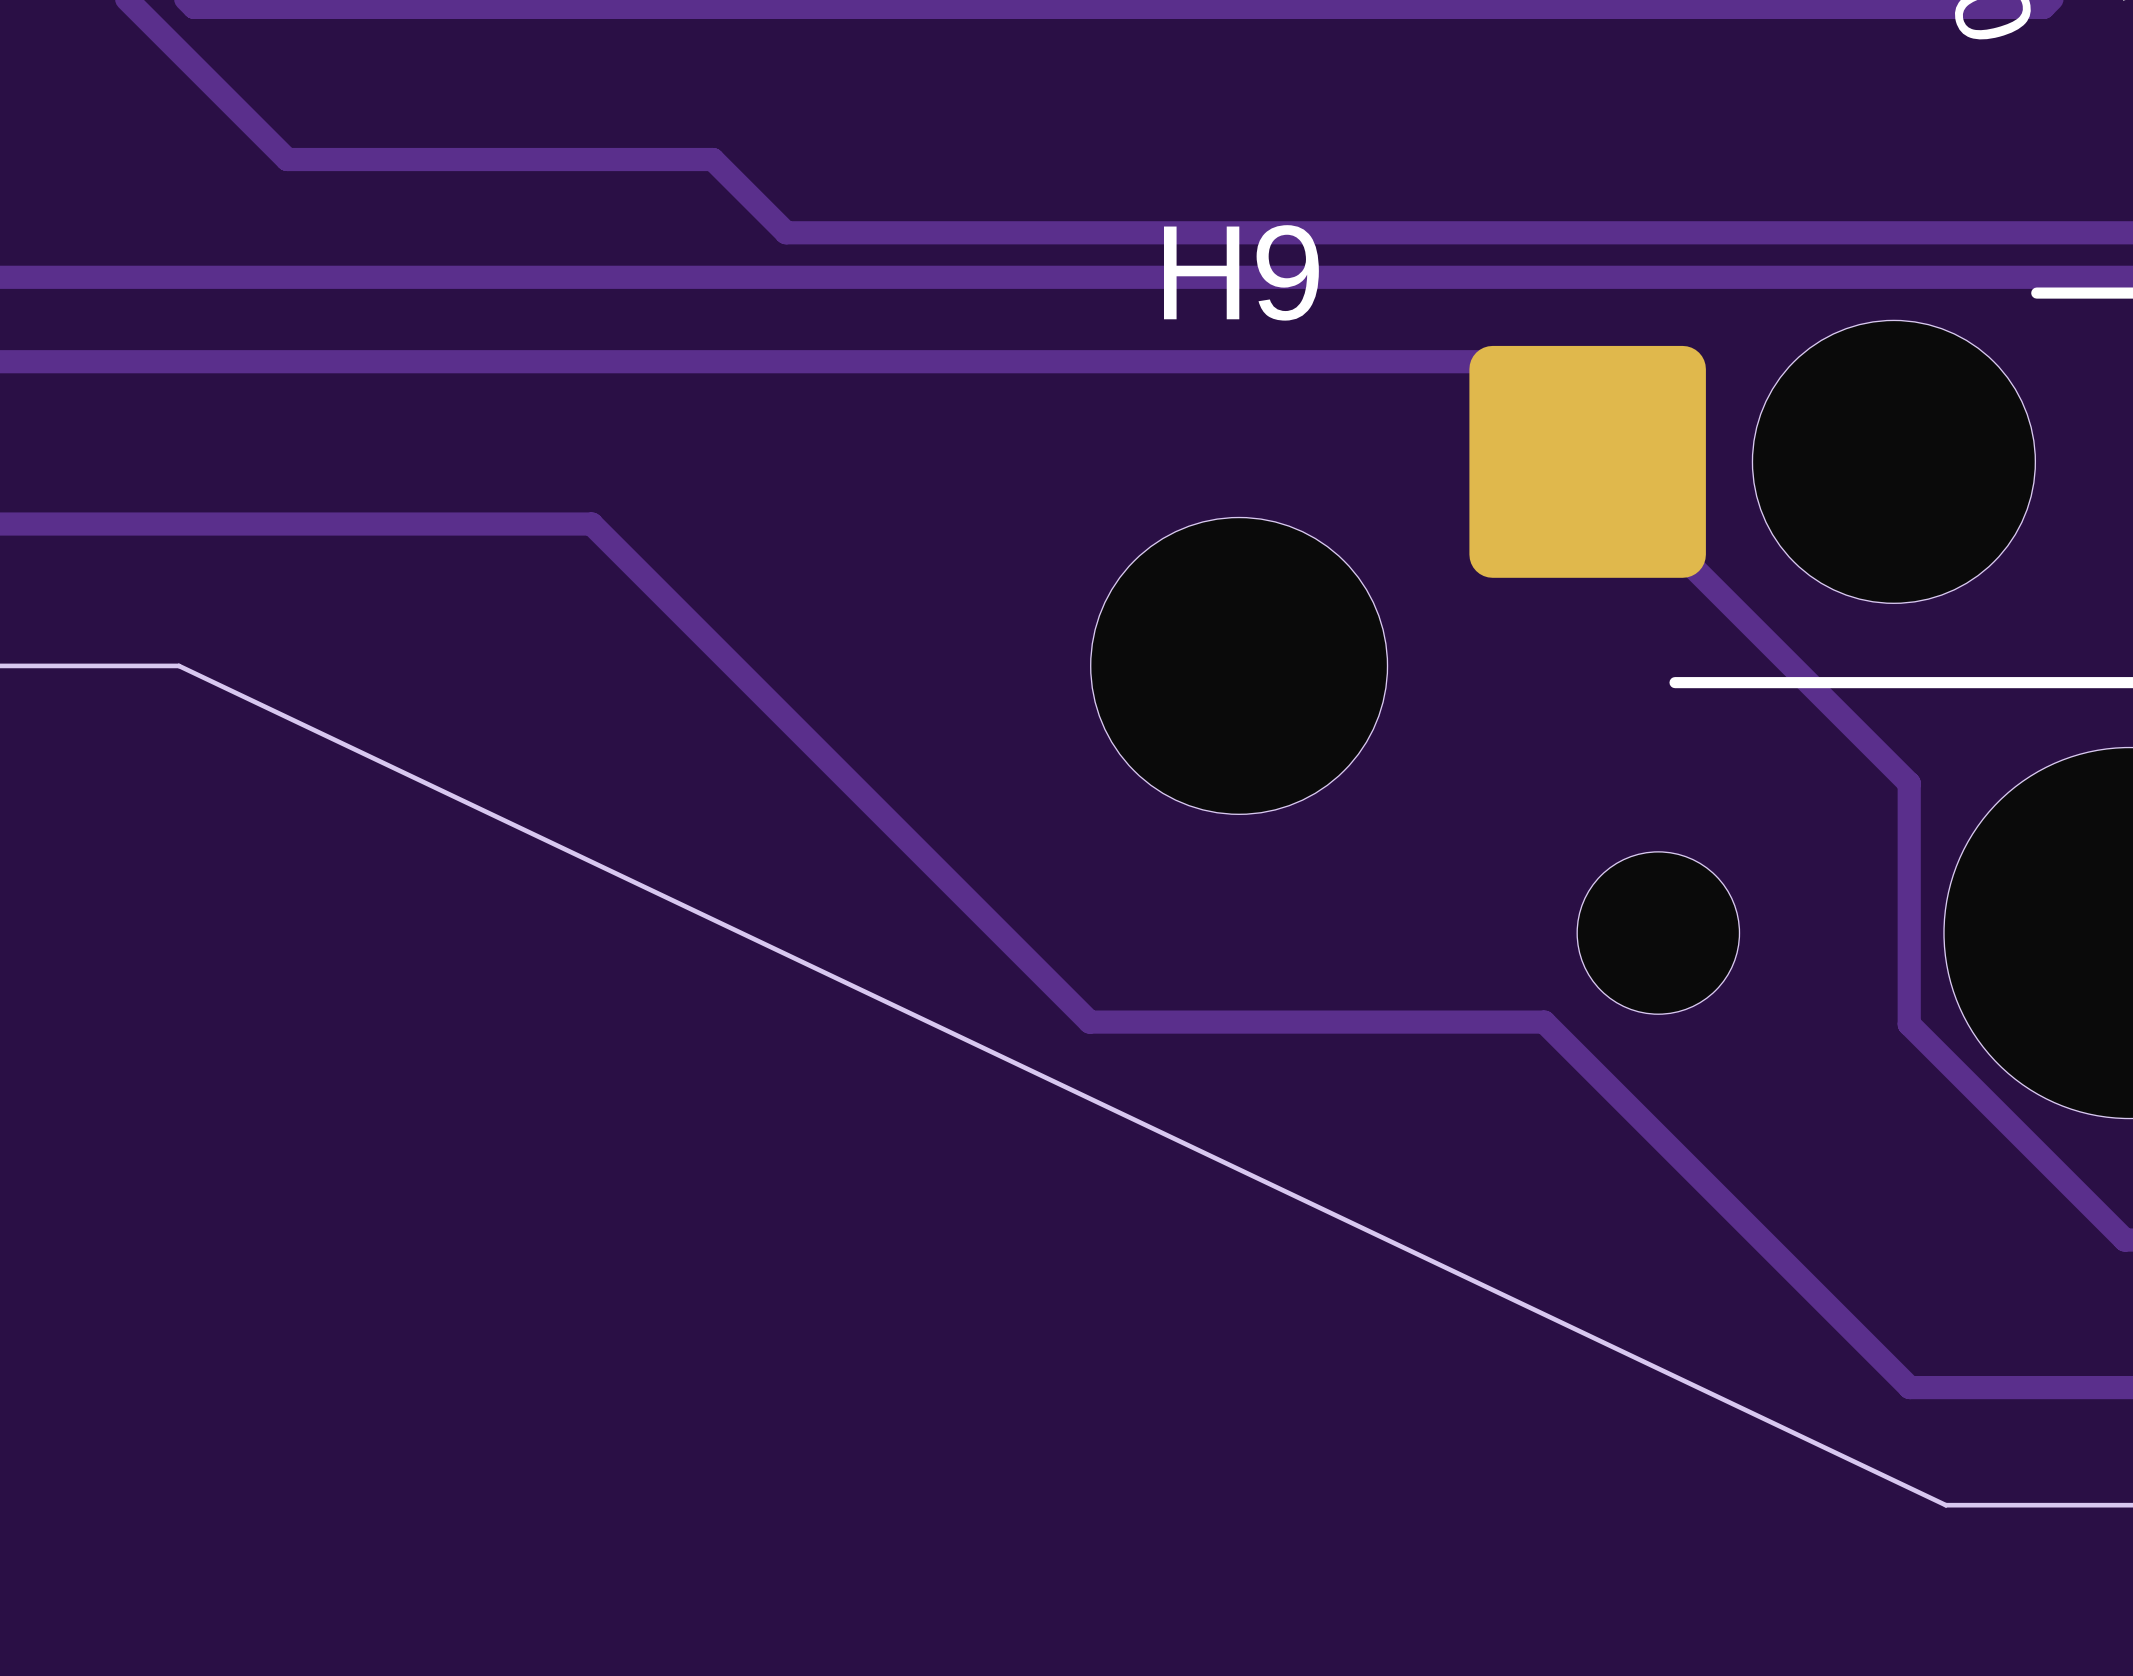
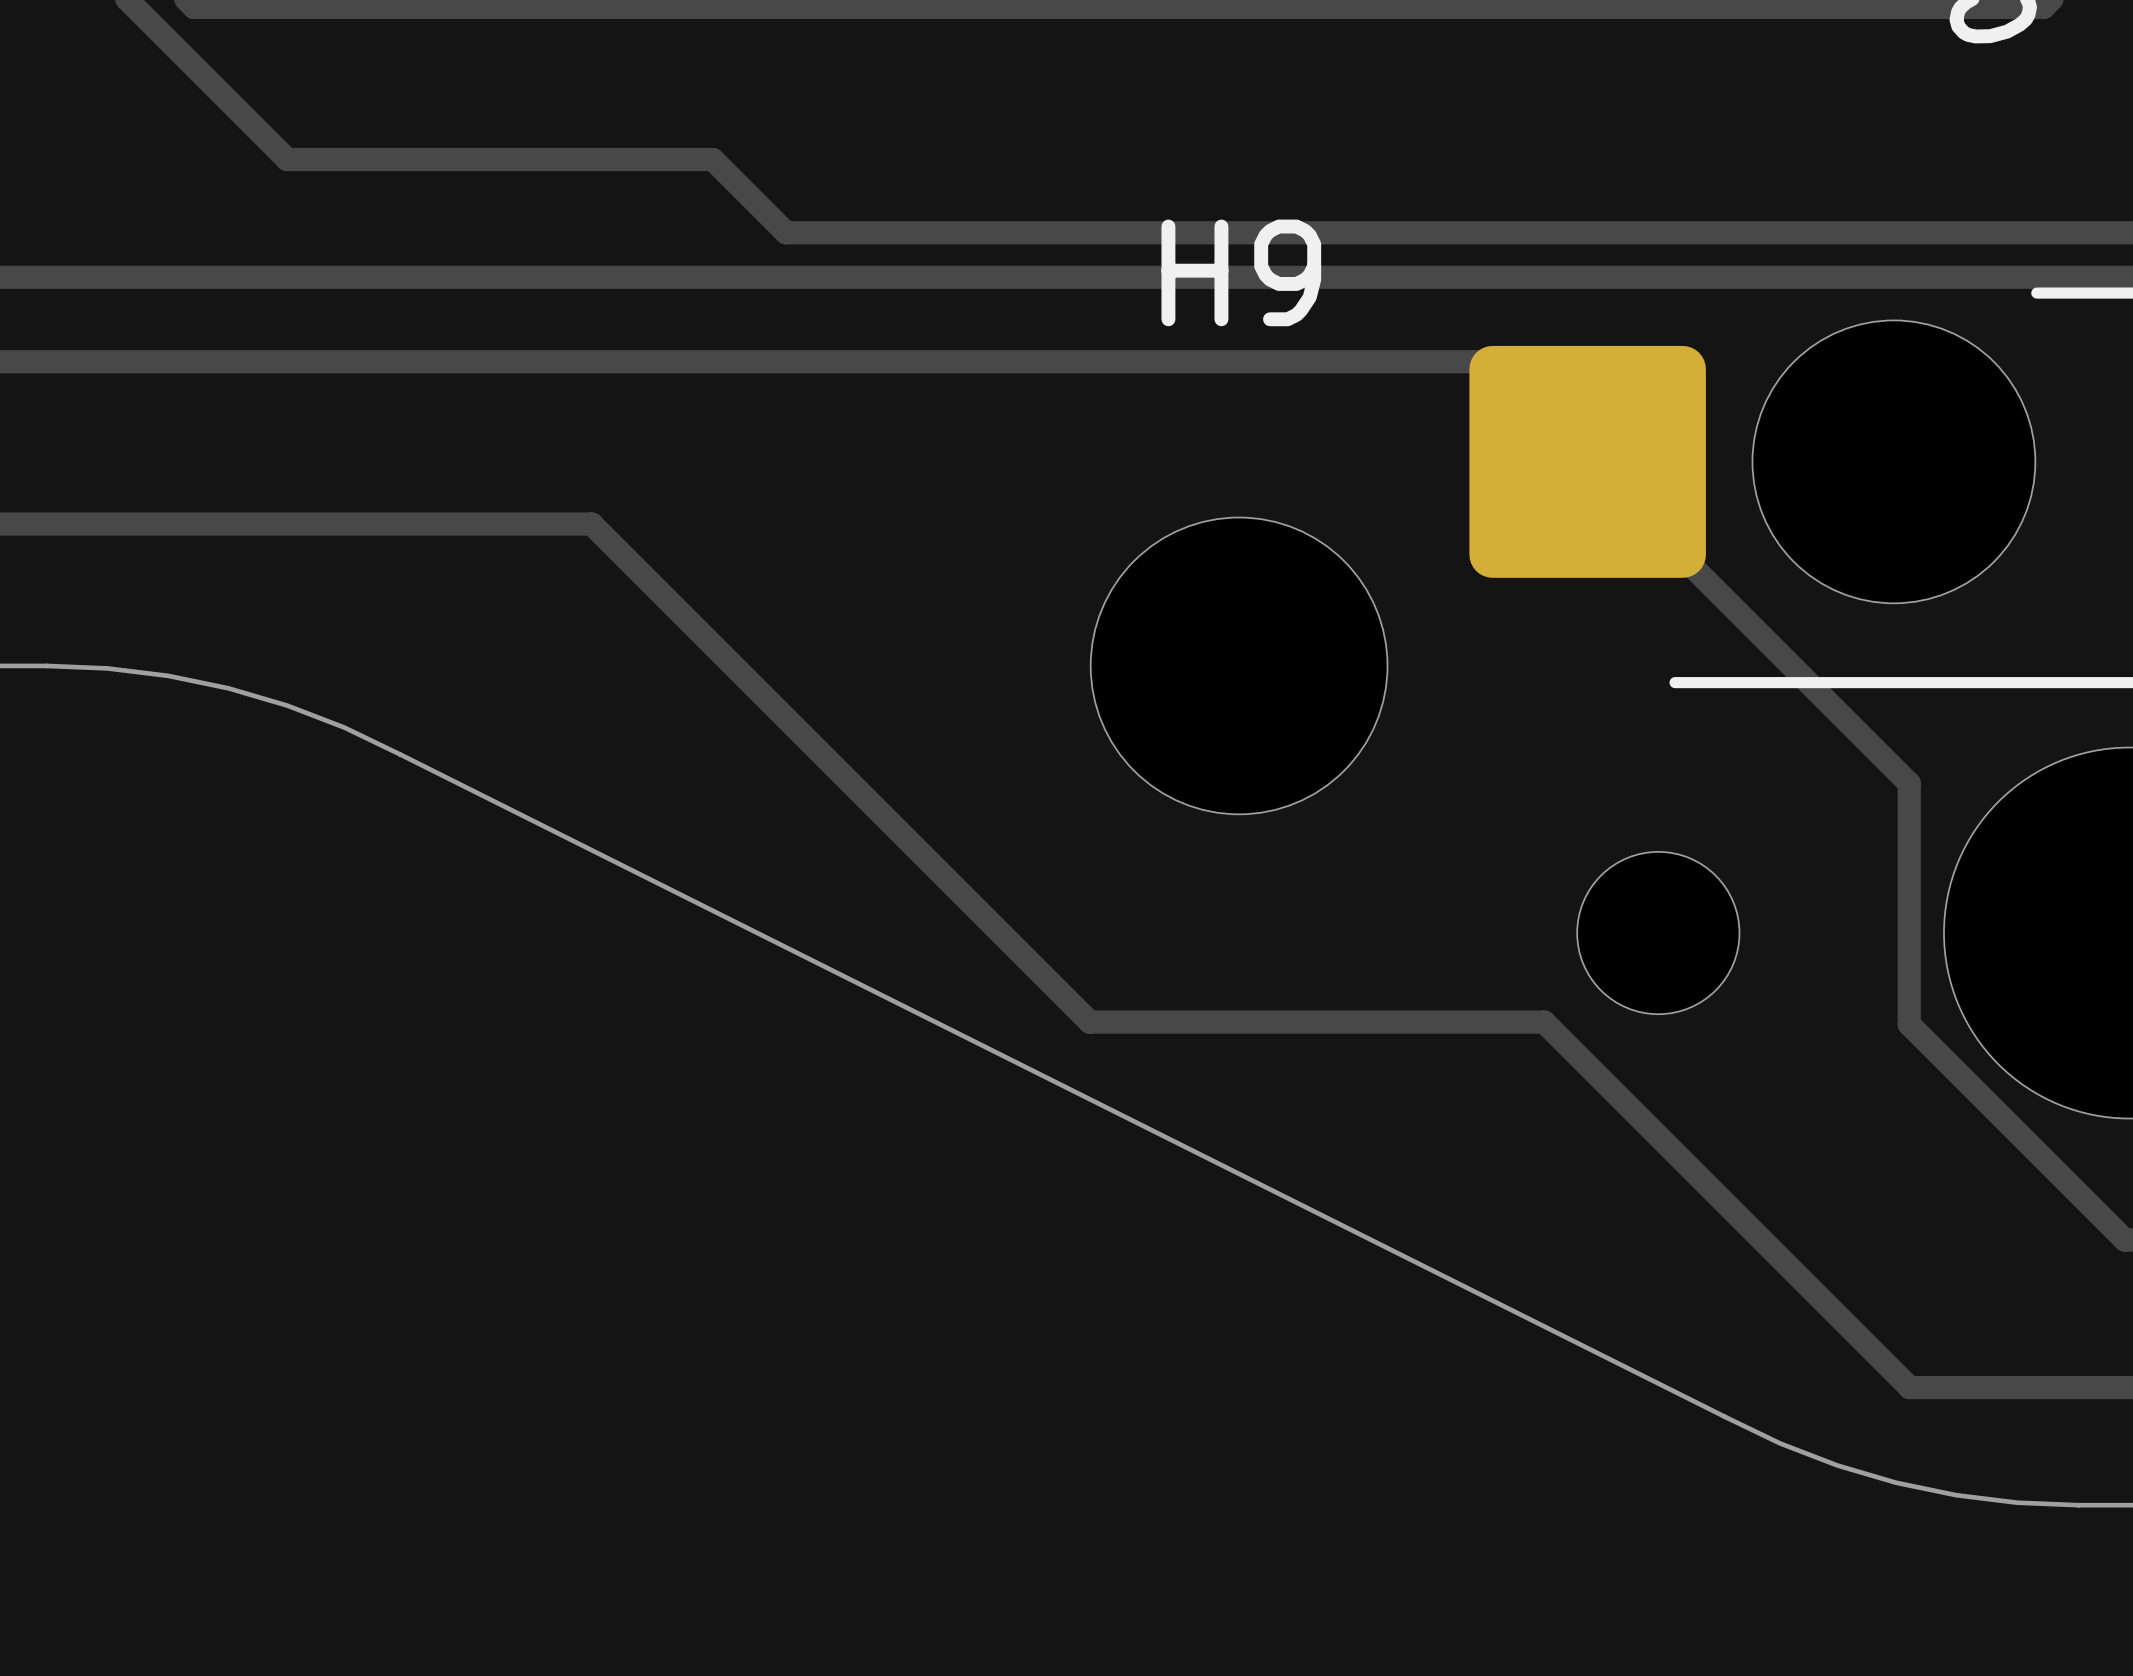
board edge: (46, 665) (178, 665) (1945, 1505) (2078, 1505) -> (46, 665) (107, 668) (168, 675) (228, 688) (287, 705) (344, 727) (1780, 1443) (1837, 1465) (1896, 1482) (1956, 1495) (2017, 1502) (2078, 1505)

